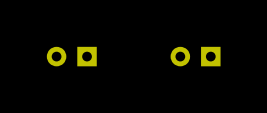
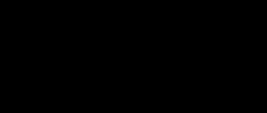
part: (71, 56) -> none
part: (195, 56) -> none

